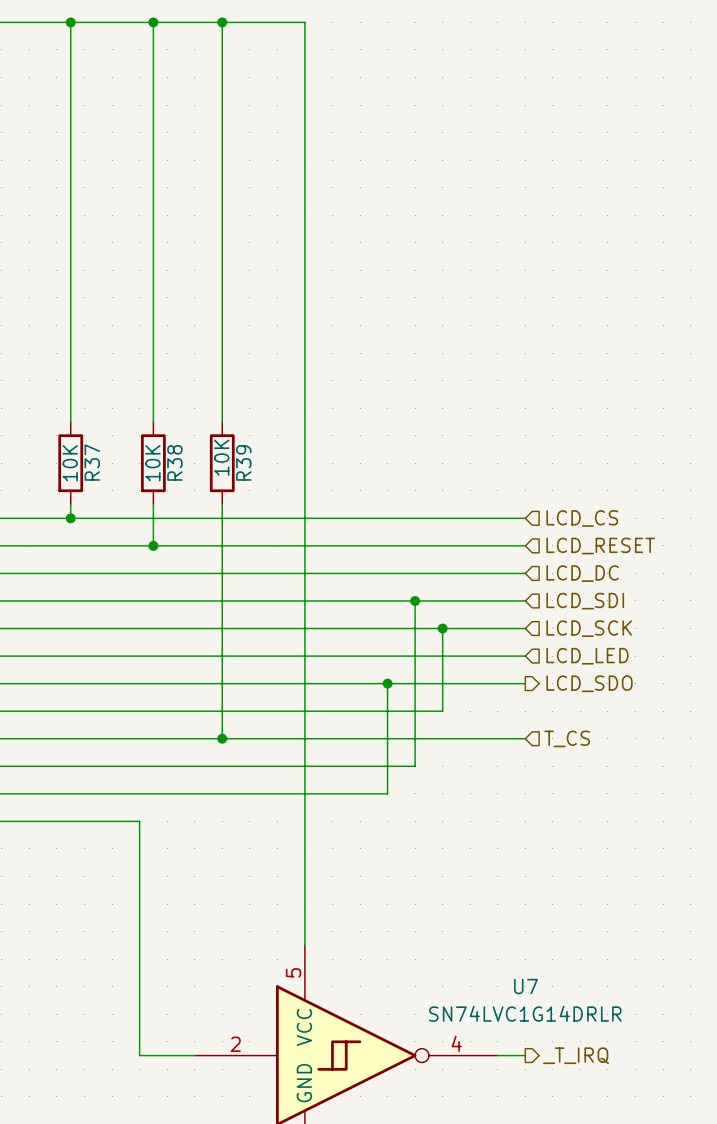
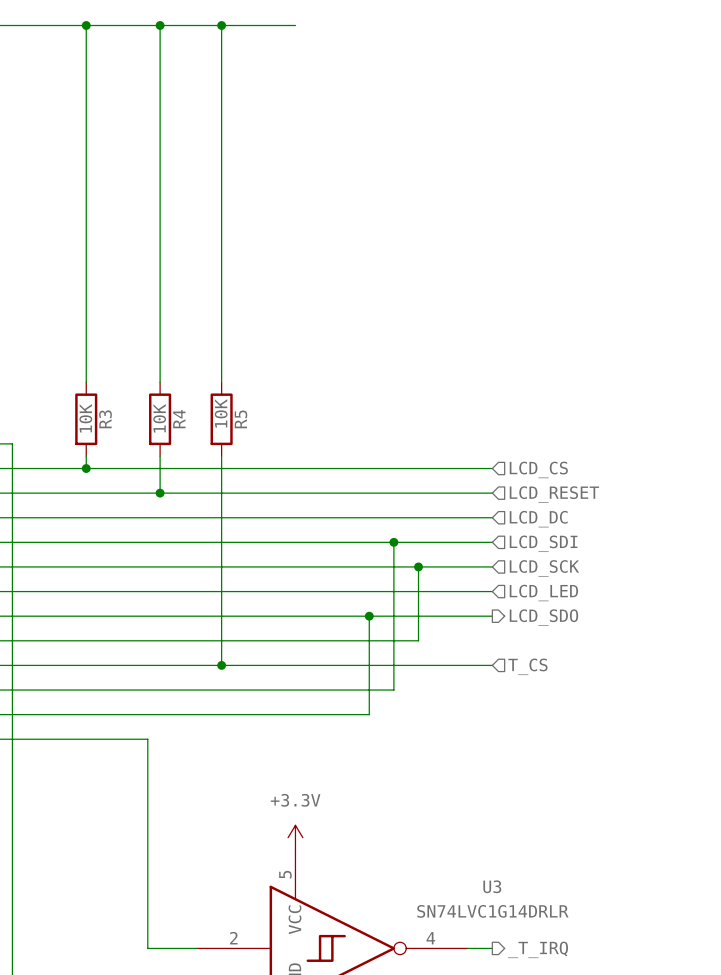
wire: (304, 22) (304, 945) -> none
R37 name: R37 (92, 462) -> R3 (105, 419)
R38 name: R38 (174, 462) -> R4 (179, 419)
R39 name: R39 (243, 462) -> R5 (240, 419)
power symbol: none -> +3.3V (295, 837)
U7 name: U7 (525, 986) -> U3 (492, 886)

